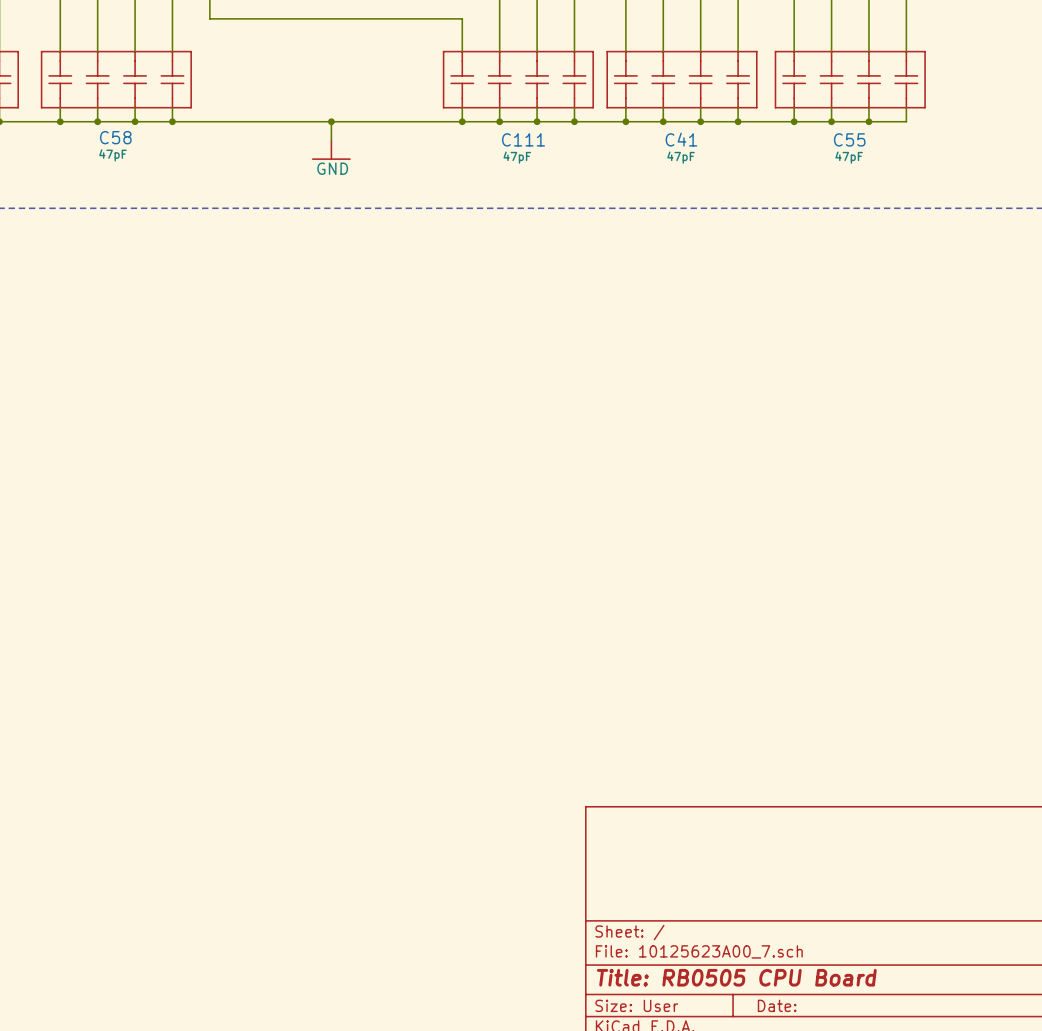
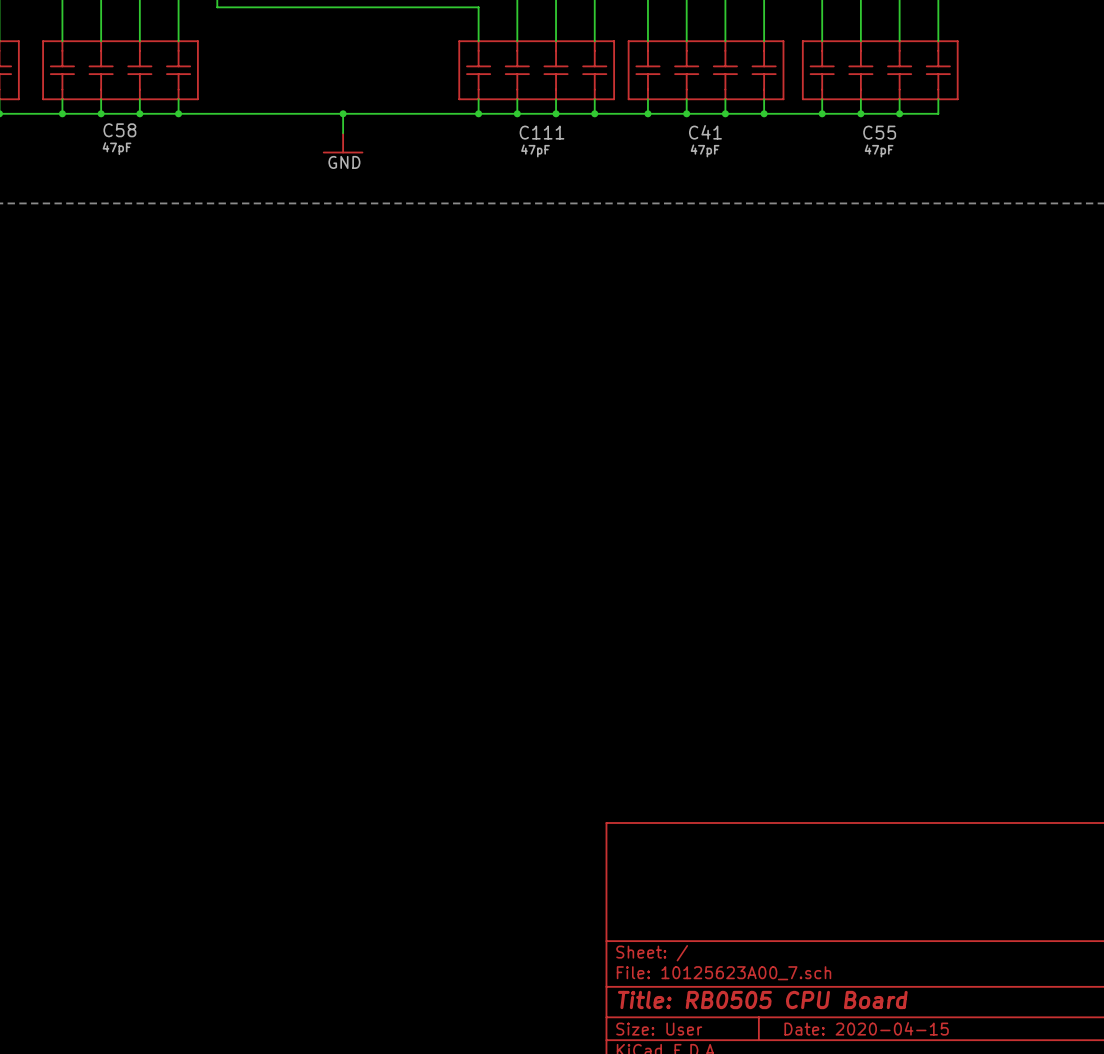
title block: Date: (777, 1005) -> Date: 2020-04-15 (866, 1028)

